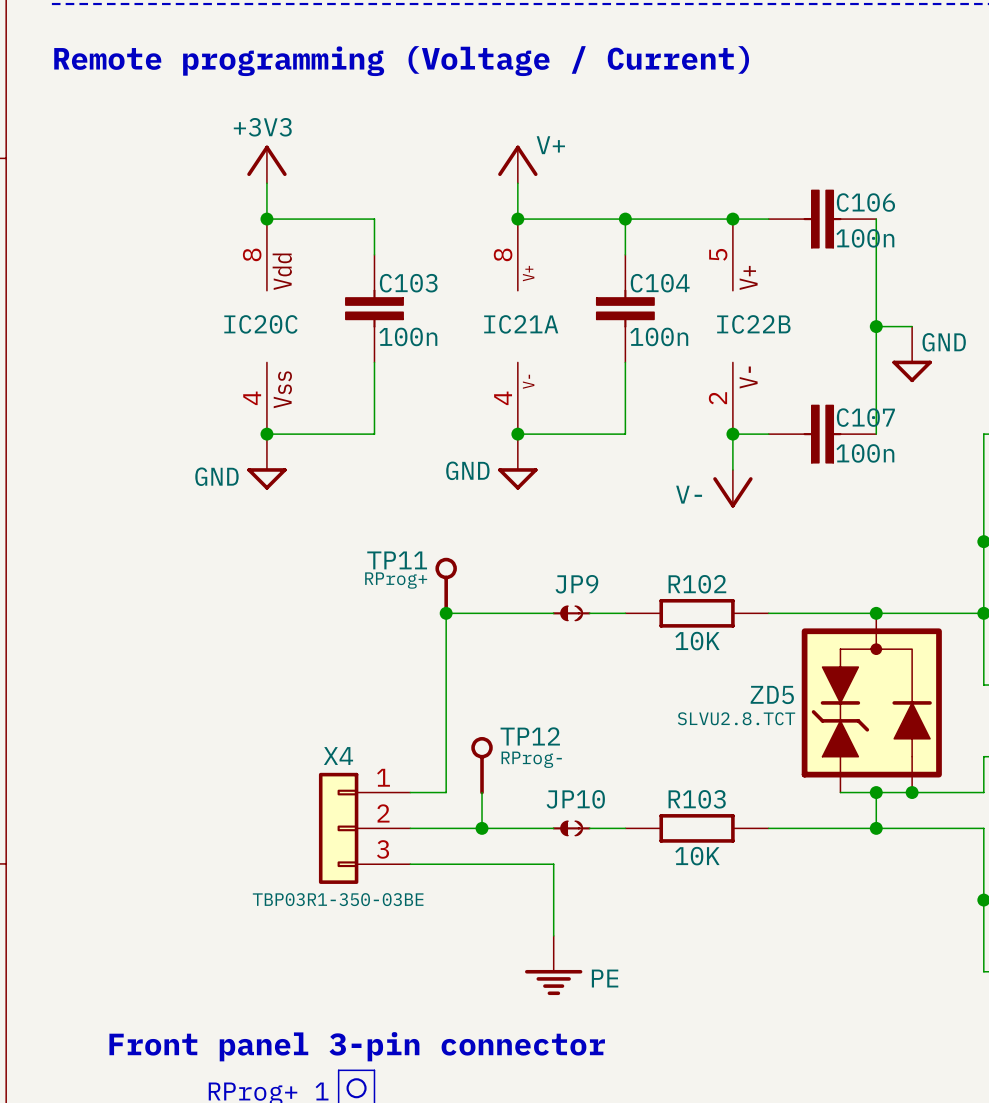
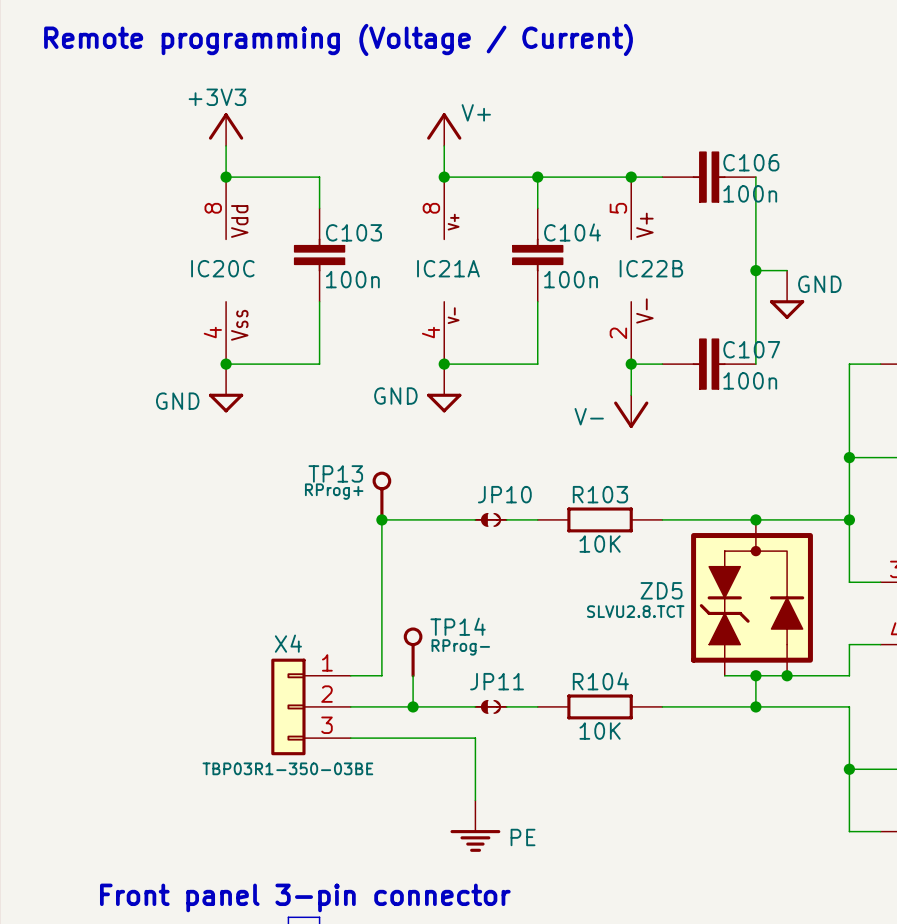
TP11 name: TP11 (397, 560) -> TP13 (335, 473)
JP9 name: JP9 (576, 584) -> JP10 (504, 494)
R102 name: R102 (697, 584) -> R103 (600, 494)
TP12 name: TP12 (530, 736) -> TP14 (458, 626)
JP10 name: JP10 (575, 799) -> JP11 (497, 681)
R103 name: R103 (697, 799) -> R104 (600, 681)

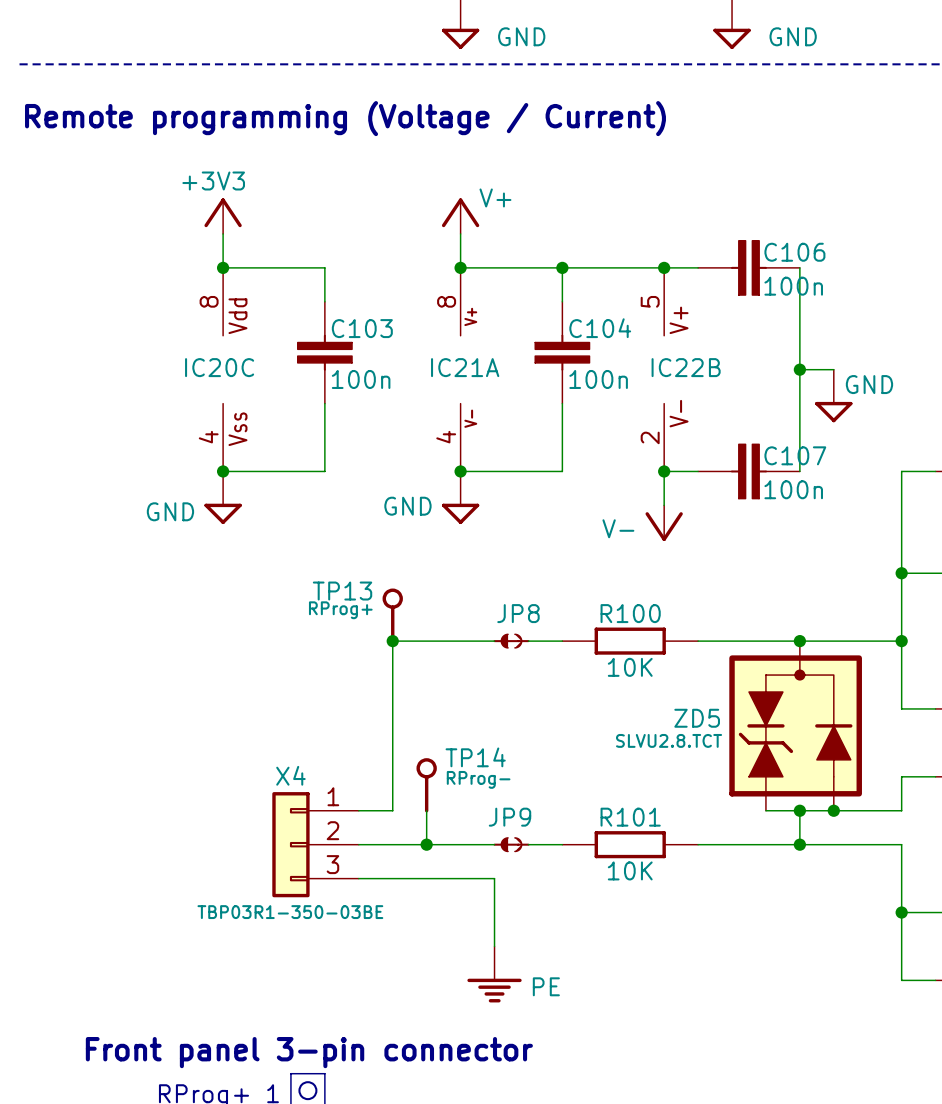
JP10 name: JP10 (504, 494) -> JP8 (518, 613)
R103 name: R103 (600, 494) -> R100 (630, 613)
JP11 name: JP11 (497, 681) -> JP9 (510, 817)
R104 name: R104 (600, 681) -> R101 (630, 817)

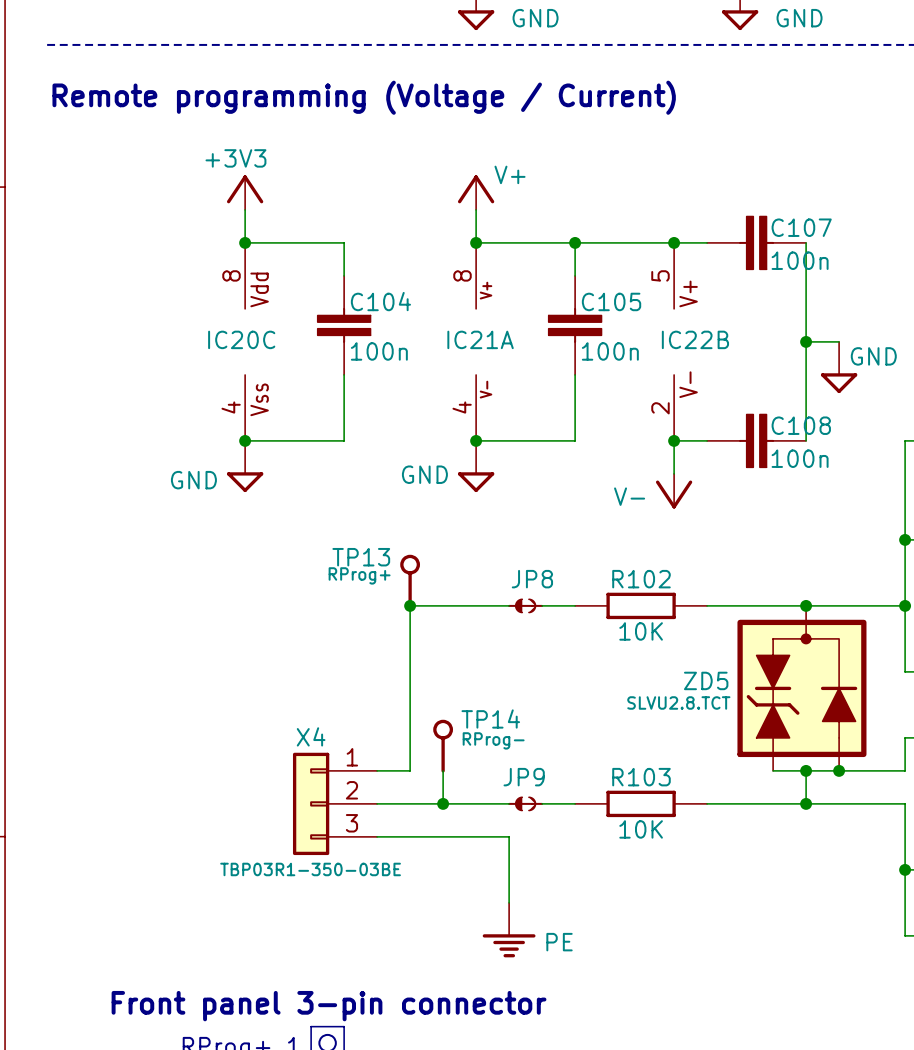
C106 name: C106 (794, 252) -> C107 (801, 227)
C103 name: C103 (362, 328) -> C104 (380, 301)
C104 name: C104 (600, 328) -> C105 (611, 301)
C107 name: C107 (795, 455) -> C108 (801, 425)
R100 name: R100 (630, 613) -> R102 (641, 579)
R101 name: R101 (630, 817) -> R103 (641, 777)

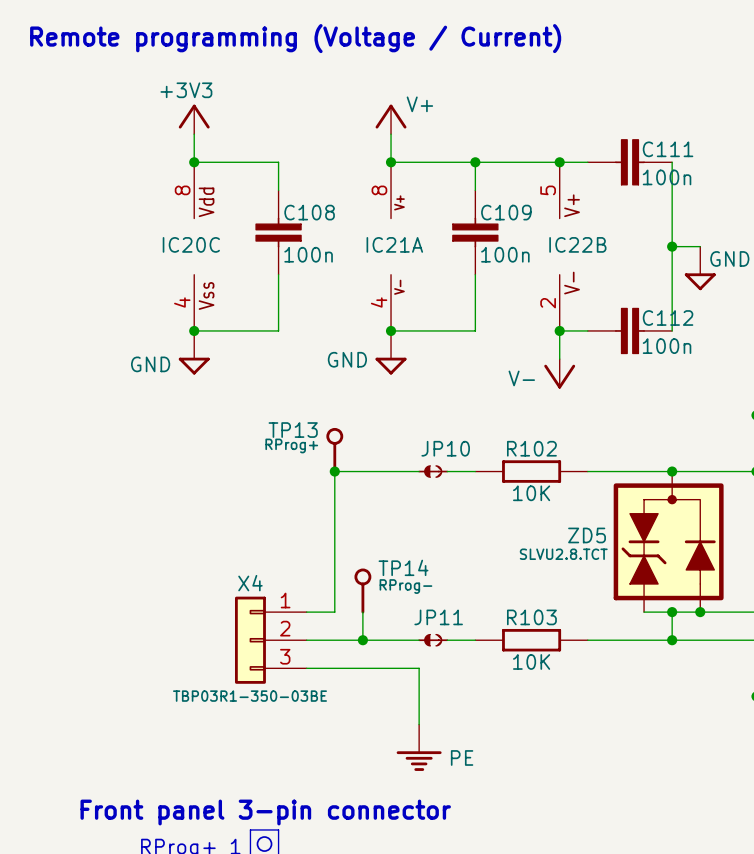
C107 name: C107 (801, 227) -> C111 (668, 149)
C104 name: C104 (380, 301) -> C108 (309, 212)
C105 name: C105 (611, 301) -> C109 (506, 212)
C108 name: C108 (801, 425) -> C112 (668, 318)
JP8 name: JP8 (532, 579) -> JP10 (445, 448)
JP9 name: JP9 (524, 777) -> JP11 (438, 617)

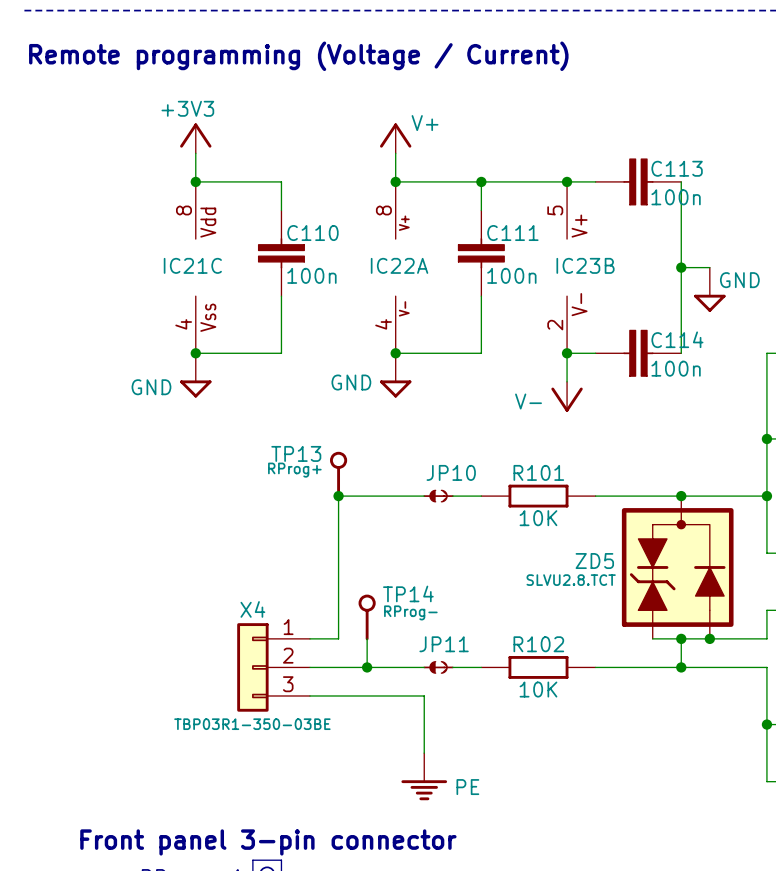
C111 name: C111 (668, 149) -> C113 (677, 168)
C108 name: C108 (309, 212) -> C110 (312, 233)
C109 name: C109 (506, 212) -> C111 (512, 233)
IC20C name: IC20C (191, 244) -> IC21C (192, 265)
IC21A name: IC21A (394, 244) -> IC22A (399, 265)
IC22B name: IC22B (577, 244) -> IC23B (585, 265)
C112 name: C112 (668, 318) -> C114 (677, 339)
R102 name: R102 (531, 448) -> R101 (538, 472)
R103 name: R103 (531, 617) -> R102 (538, 644)

